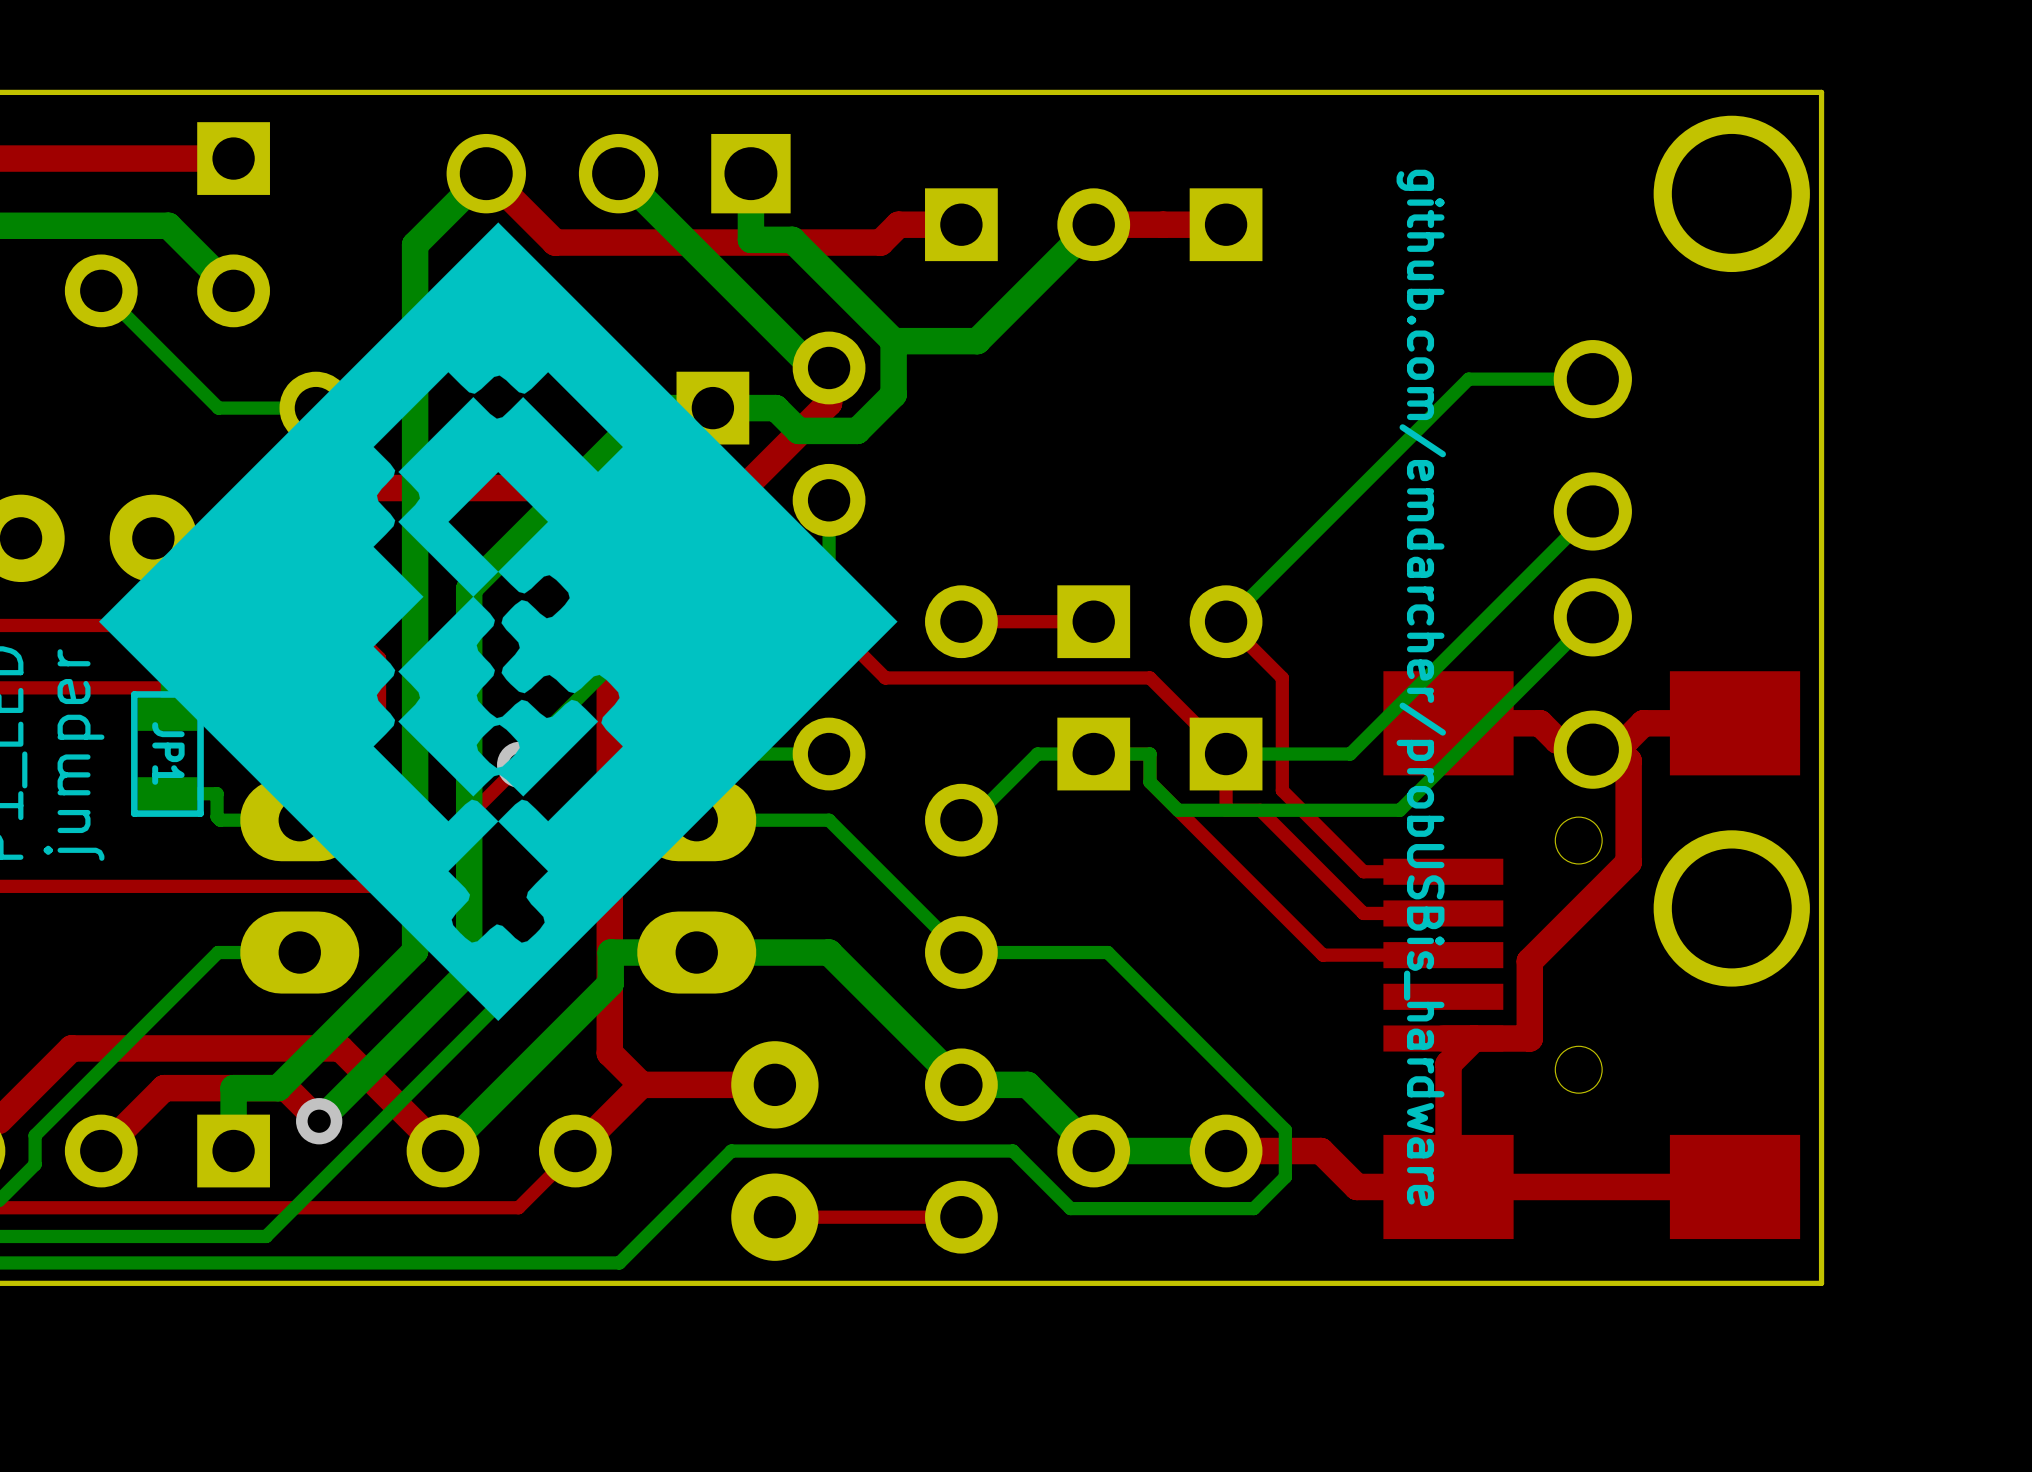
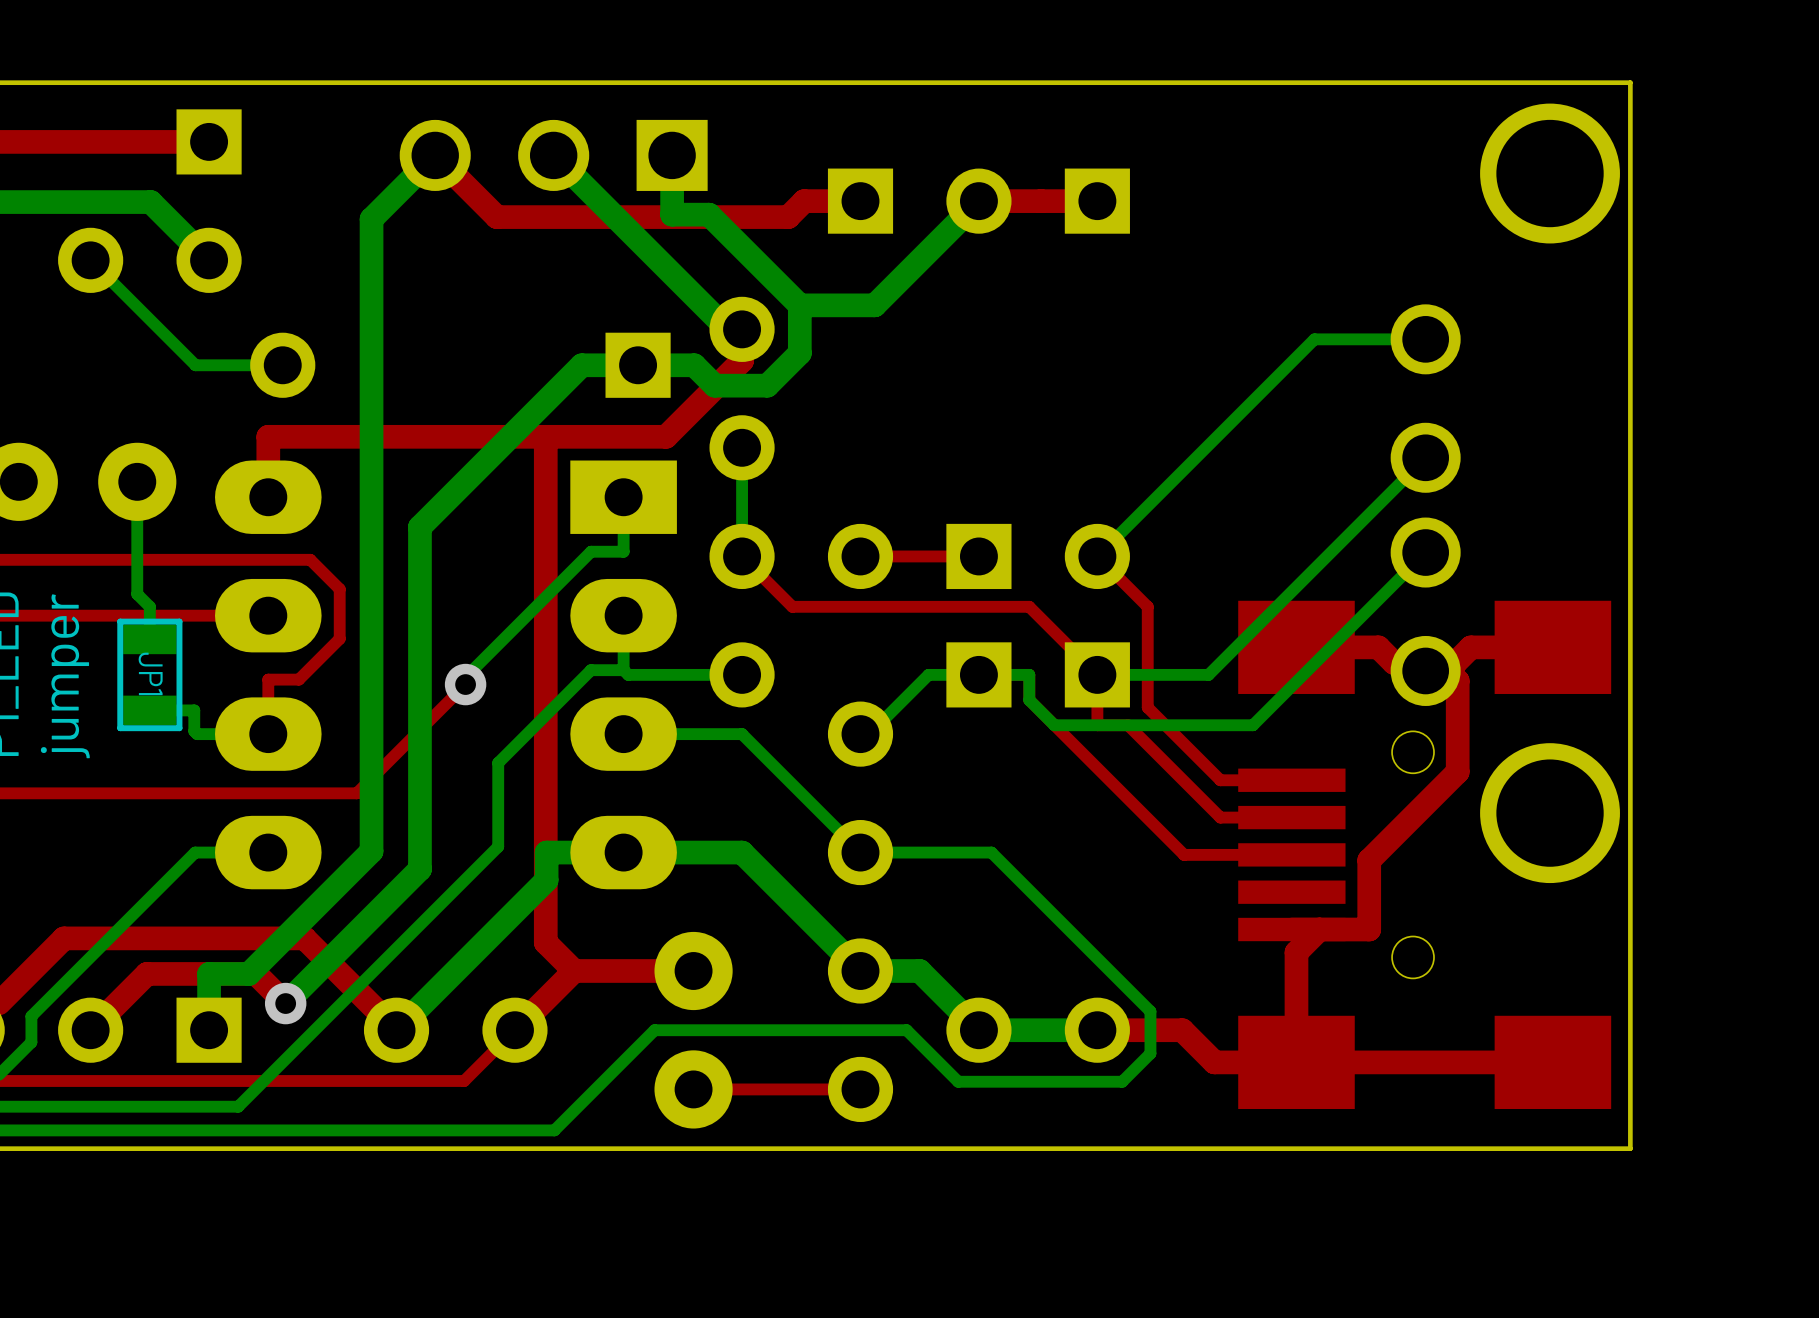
drawing: [99, 222, 898, 1021] -> none
text: github.com/emdarcher/probUSBis_hardware (1421, 687) -> none

